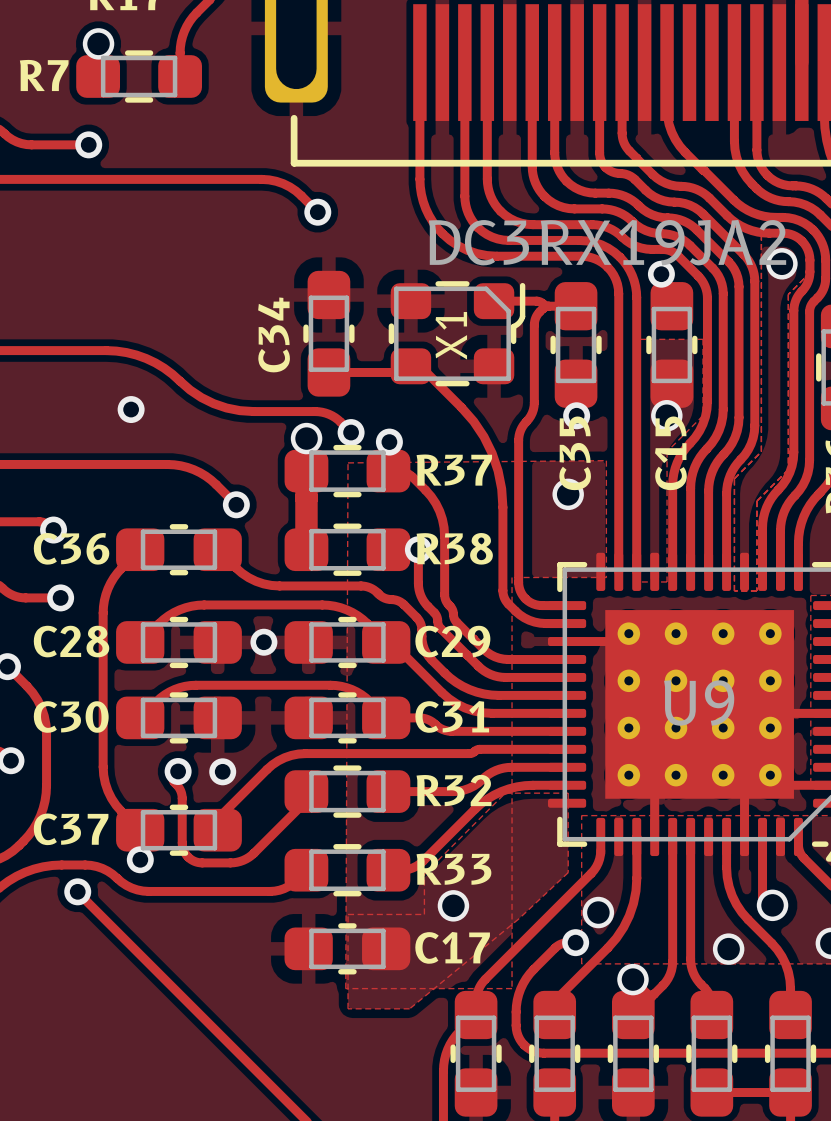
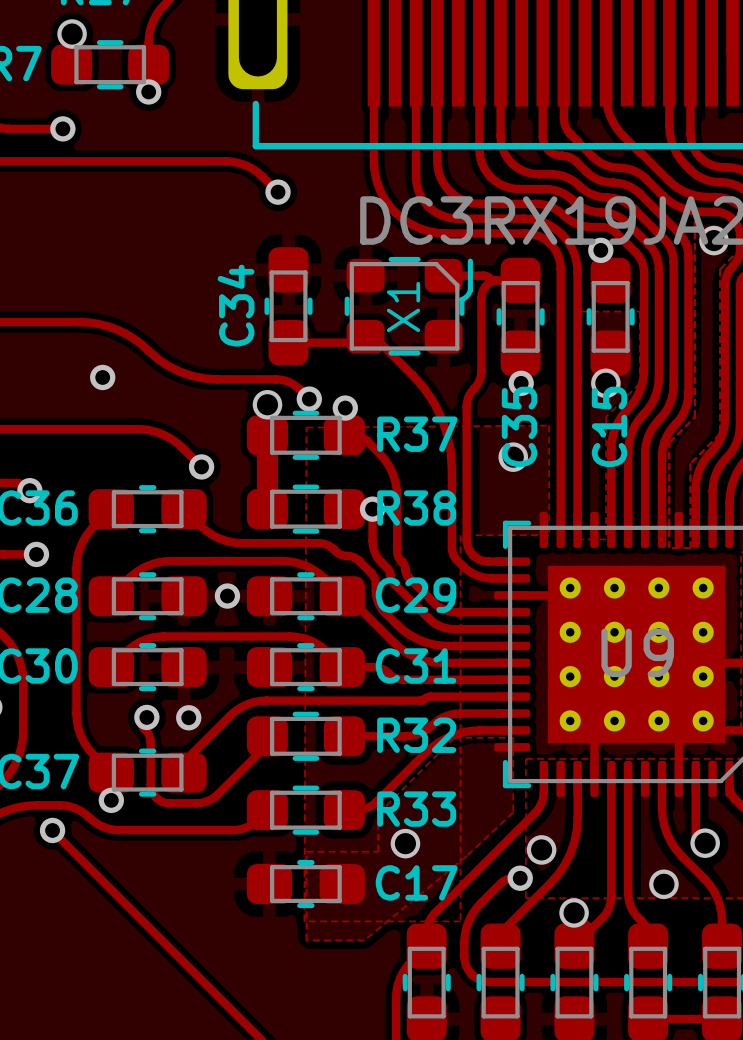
via: none -> (148, 91)

